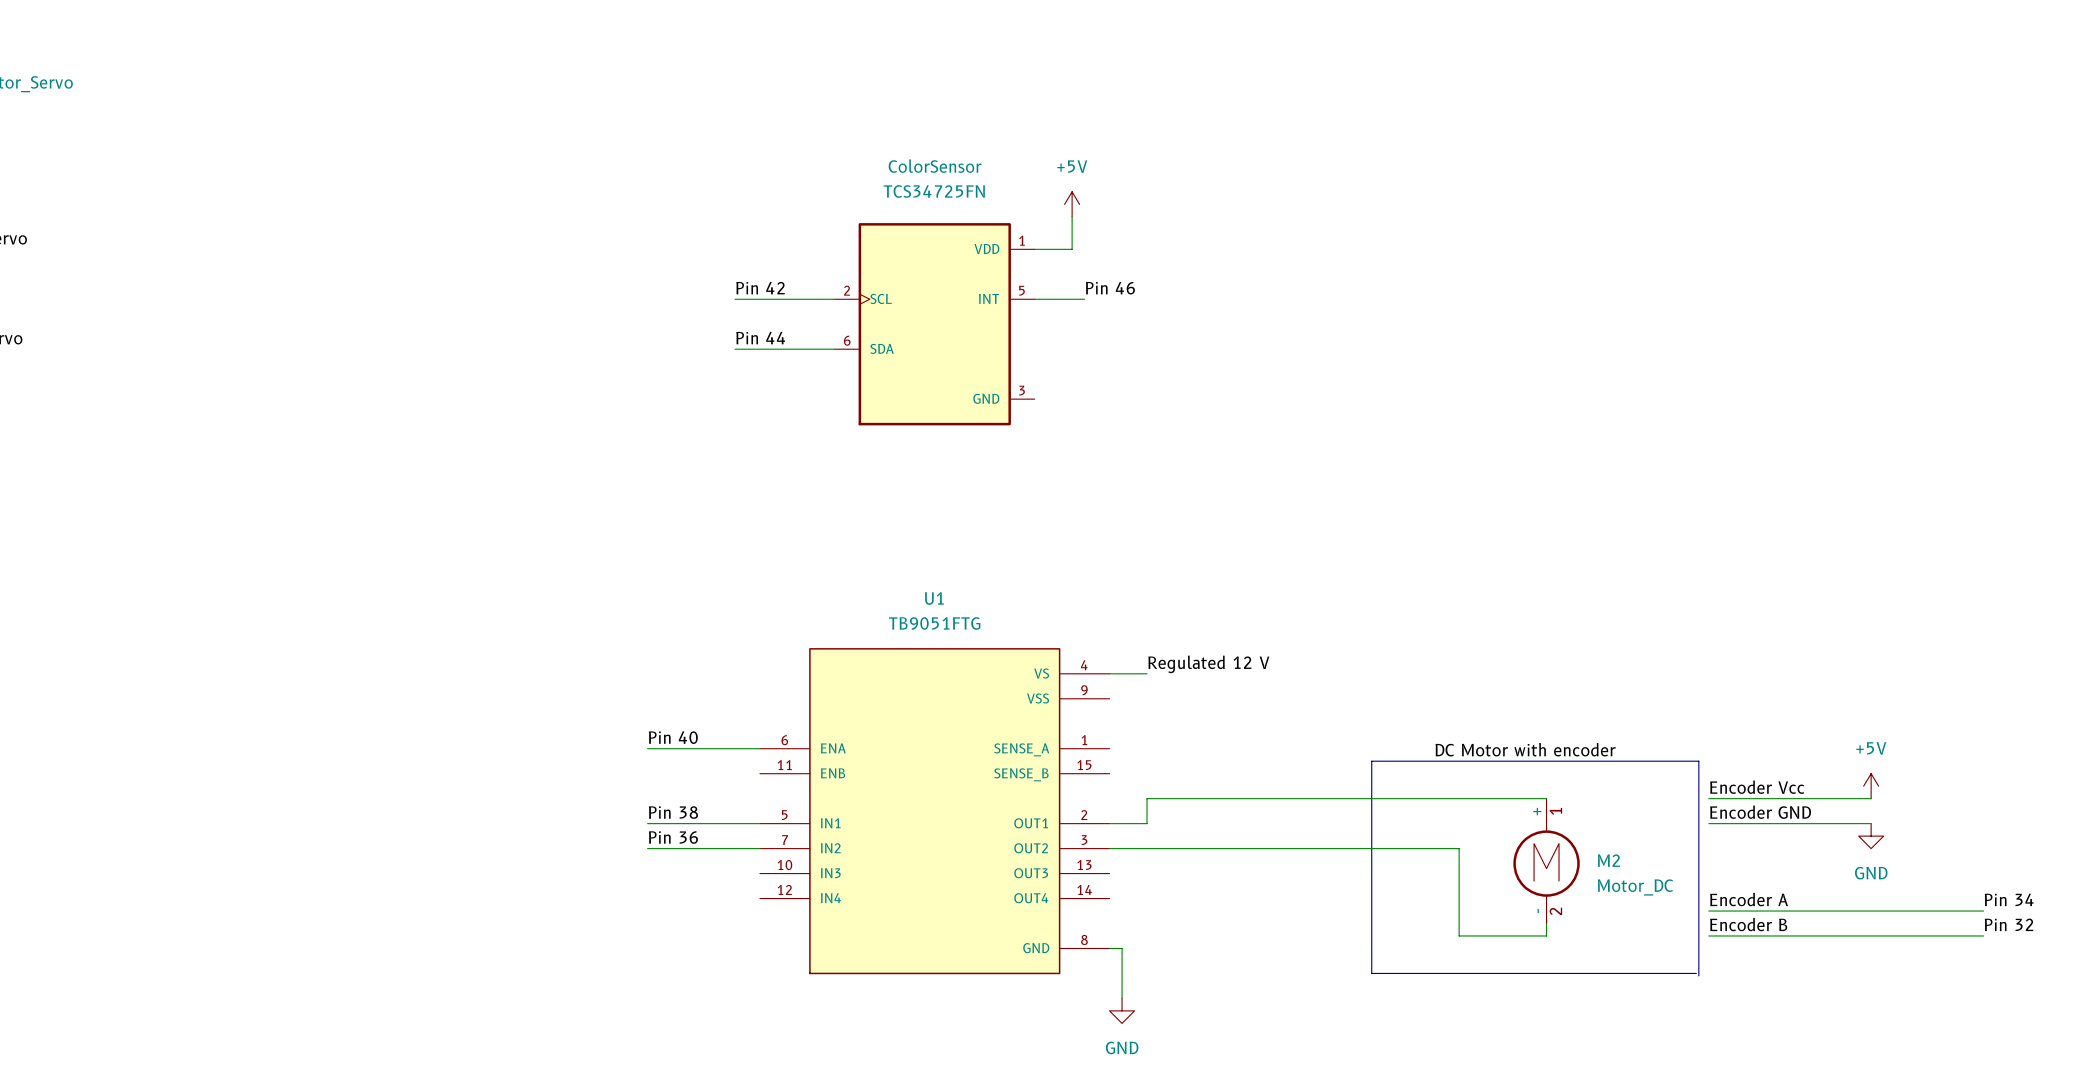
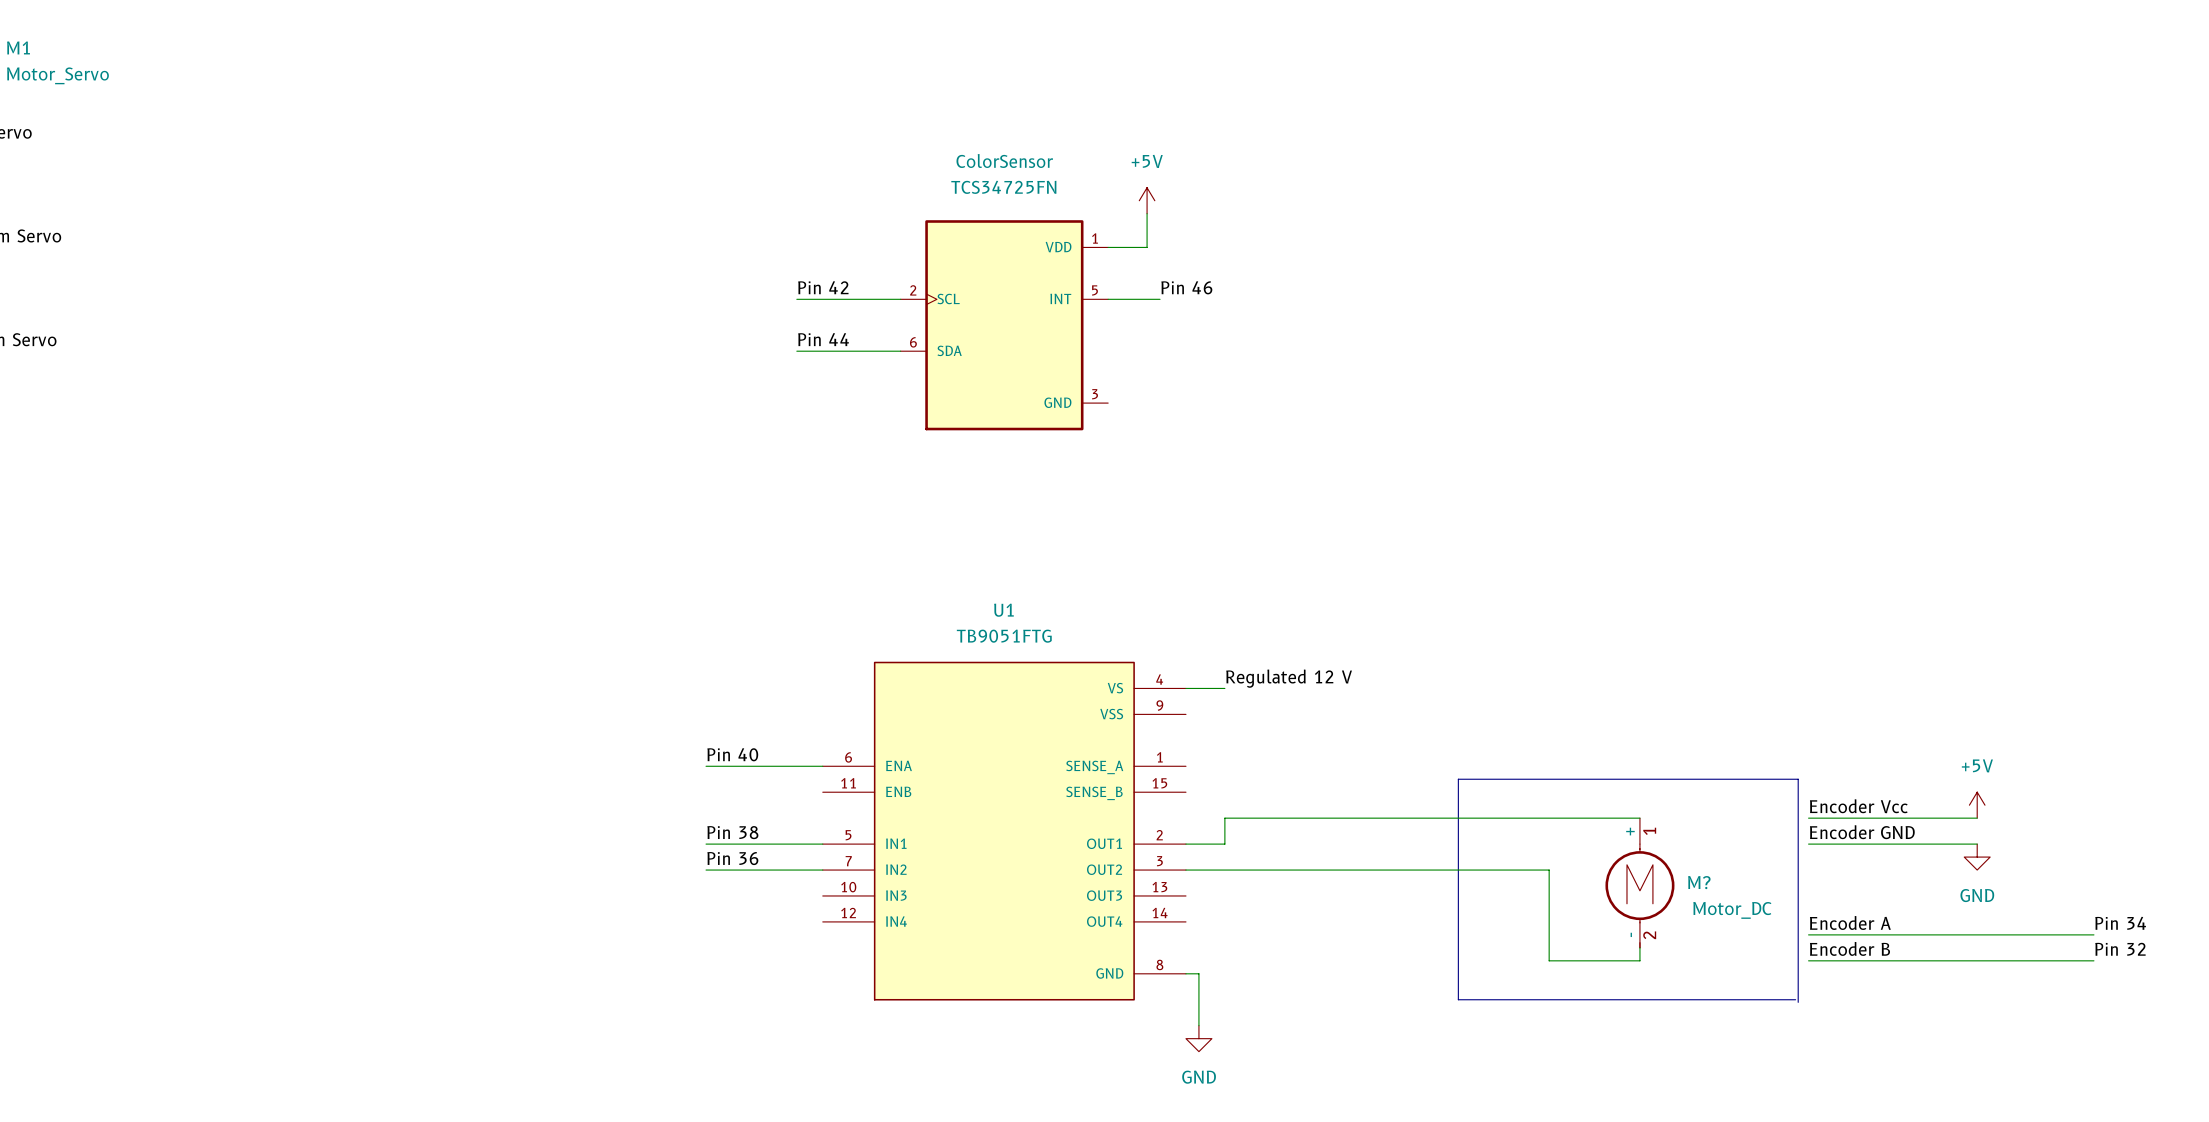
label: DC Motor with encoder (1525, 749) -> none
M2 name: M2 (1608, 860) -> M? (1699, 882)

